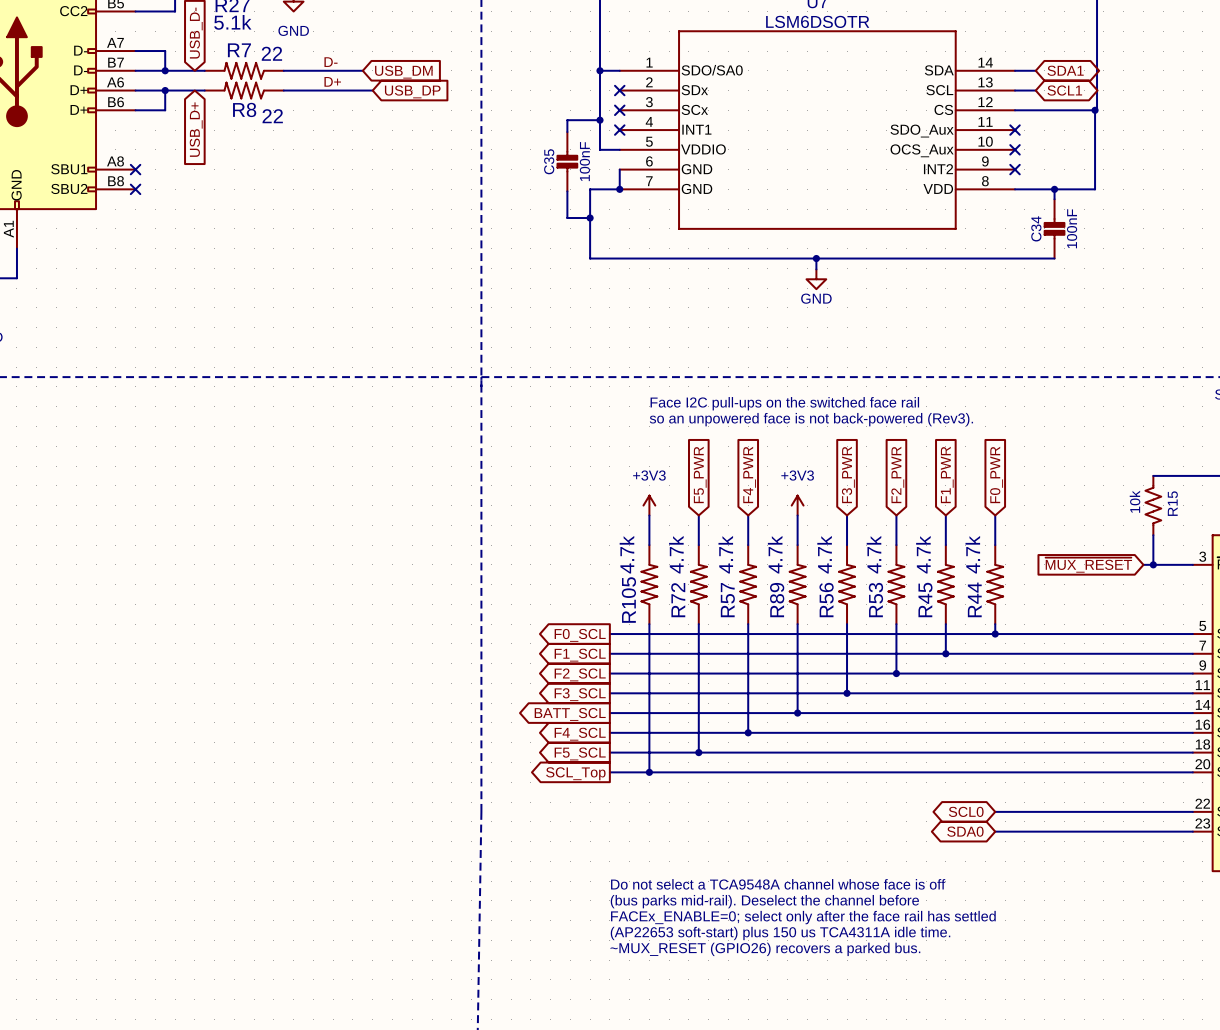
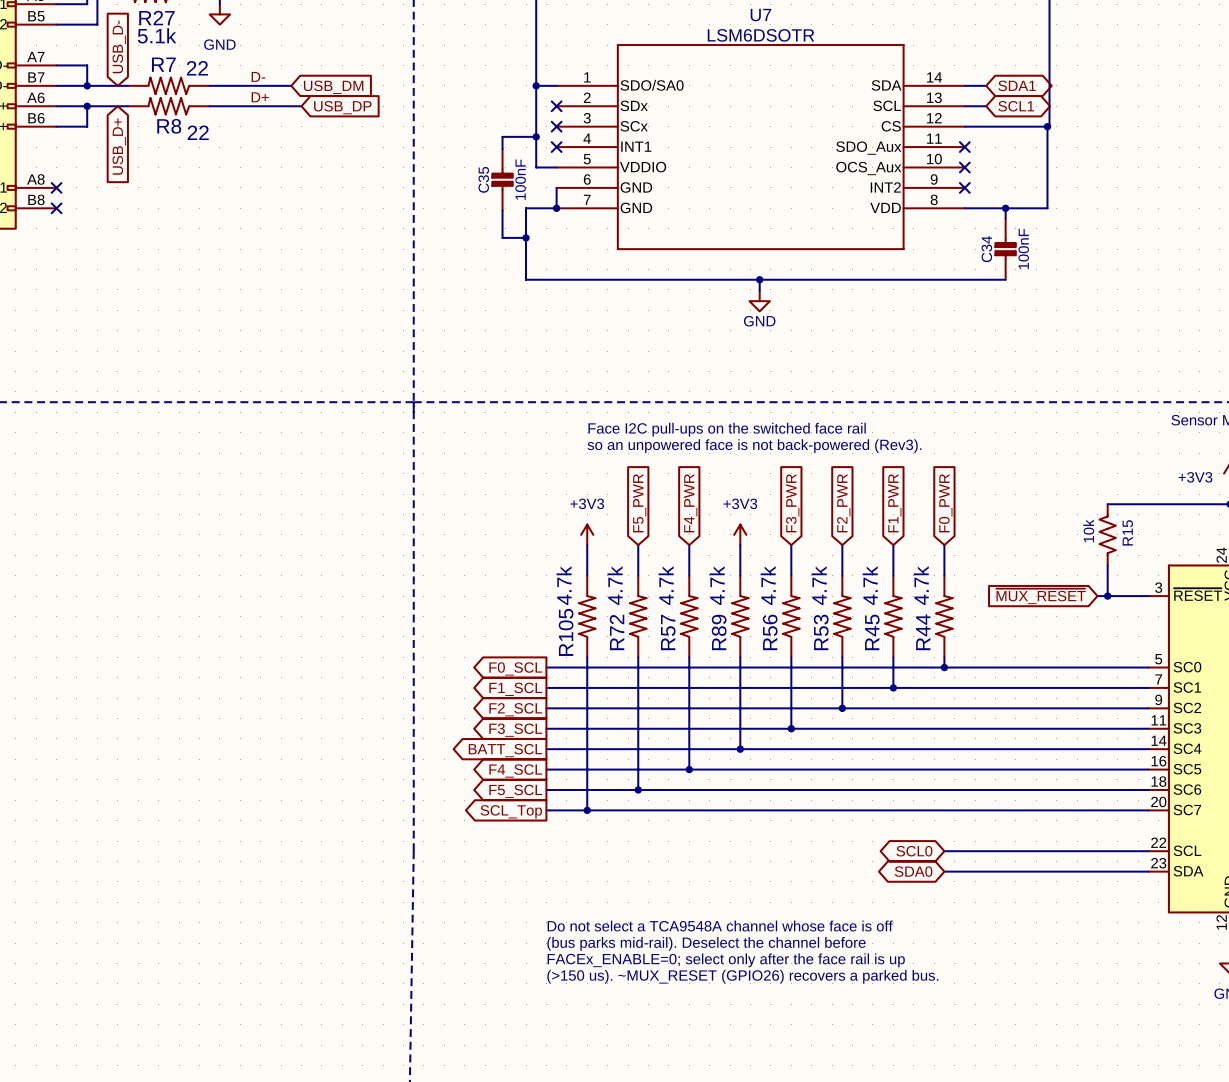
text: FACEx_ENABLE=0; select only after the face rail has settled (803, 917) -> FACEx_ENABLE=0; select only after the face rail is up (726, 960)
text: (AP22653 soft-start) plus 150 us TCA4311A idle time. (780, 933) -> (>150 us). ~MUX_RESET (GPIO26) recovers a parked bus. (742, 976)
text: ~MUX_RESET (GPIO26) recovers a parked bus. (765, 949) -> none

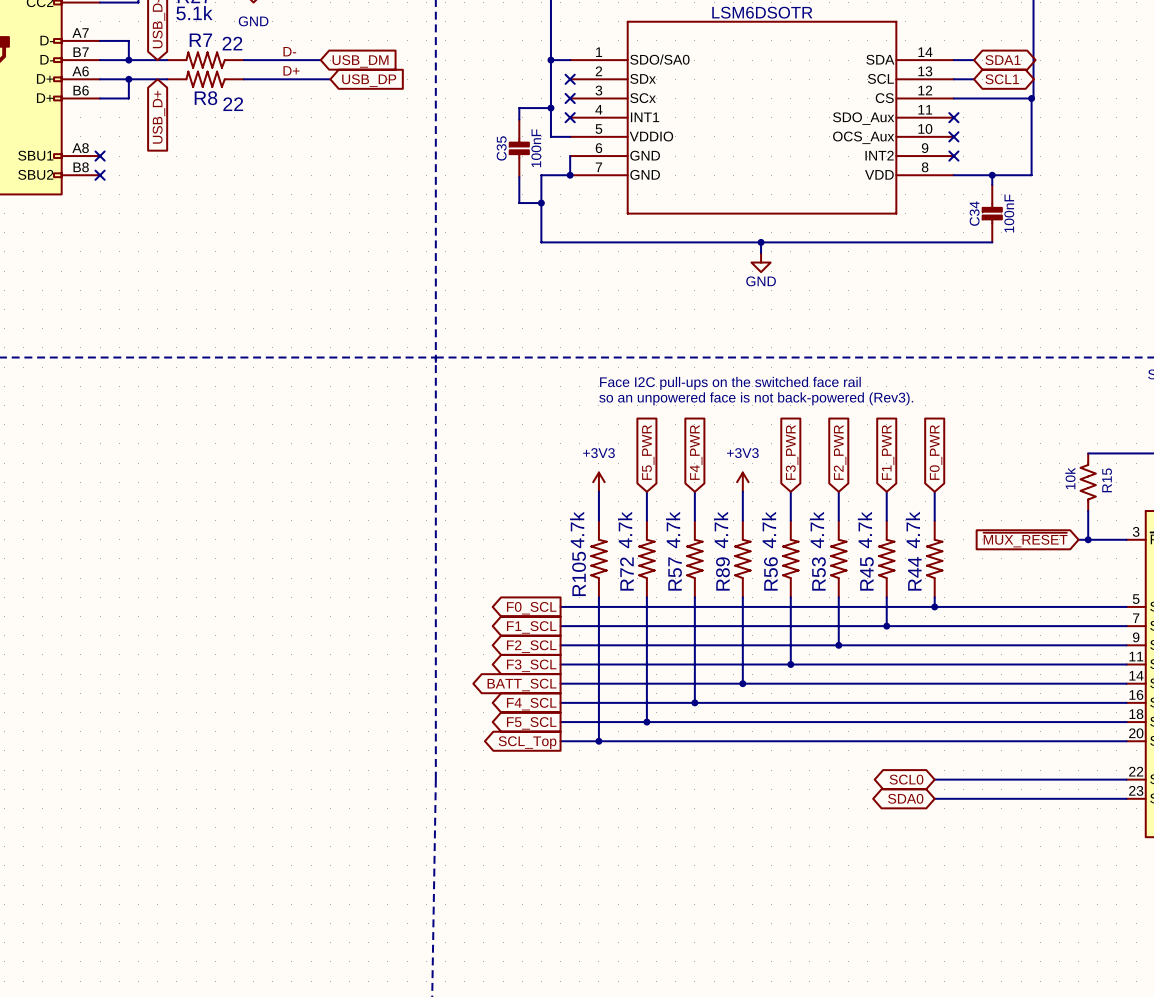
text: Do not select a TCA9548A channel whose face is off (720, 926) -> none
text: (bus parks mid-rail). Deselect the channel before (706, 943) -> none
text: FACEx_ENABLE=0; select only after the face rail is up (726, 960) -> none
text: (>150 us). ~MUX_RESET (GPIO26) recovers a parked bus. (742, 976) -> none

